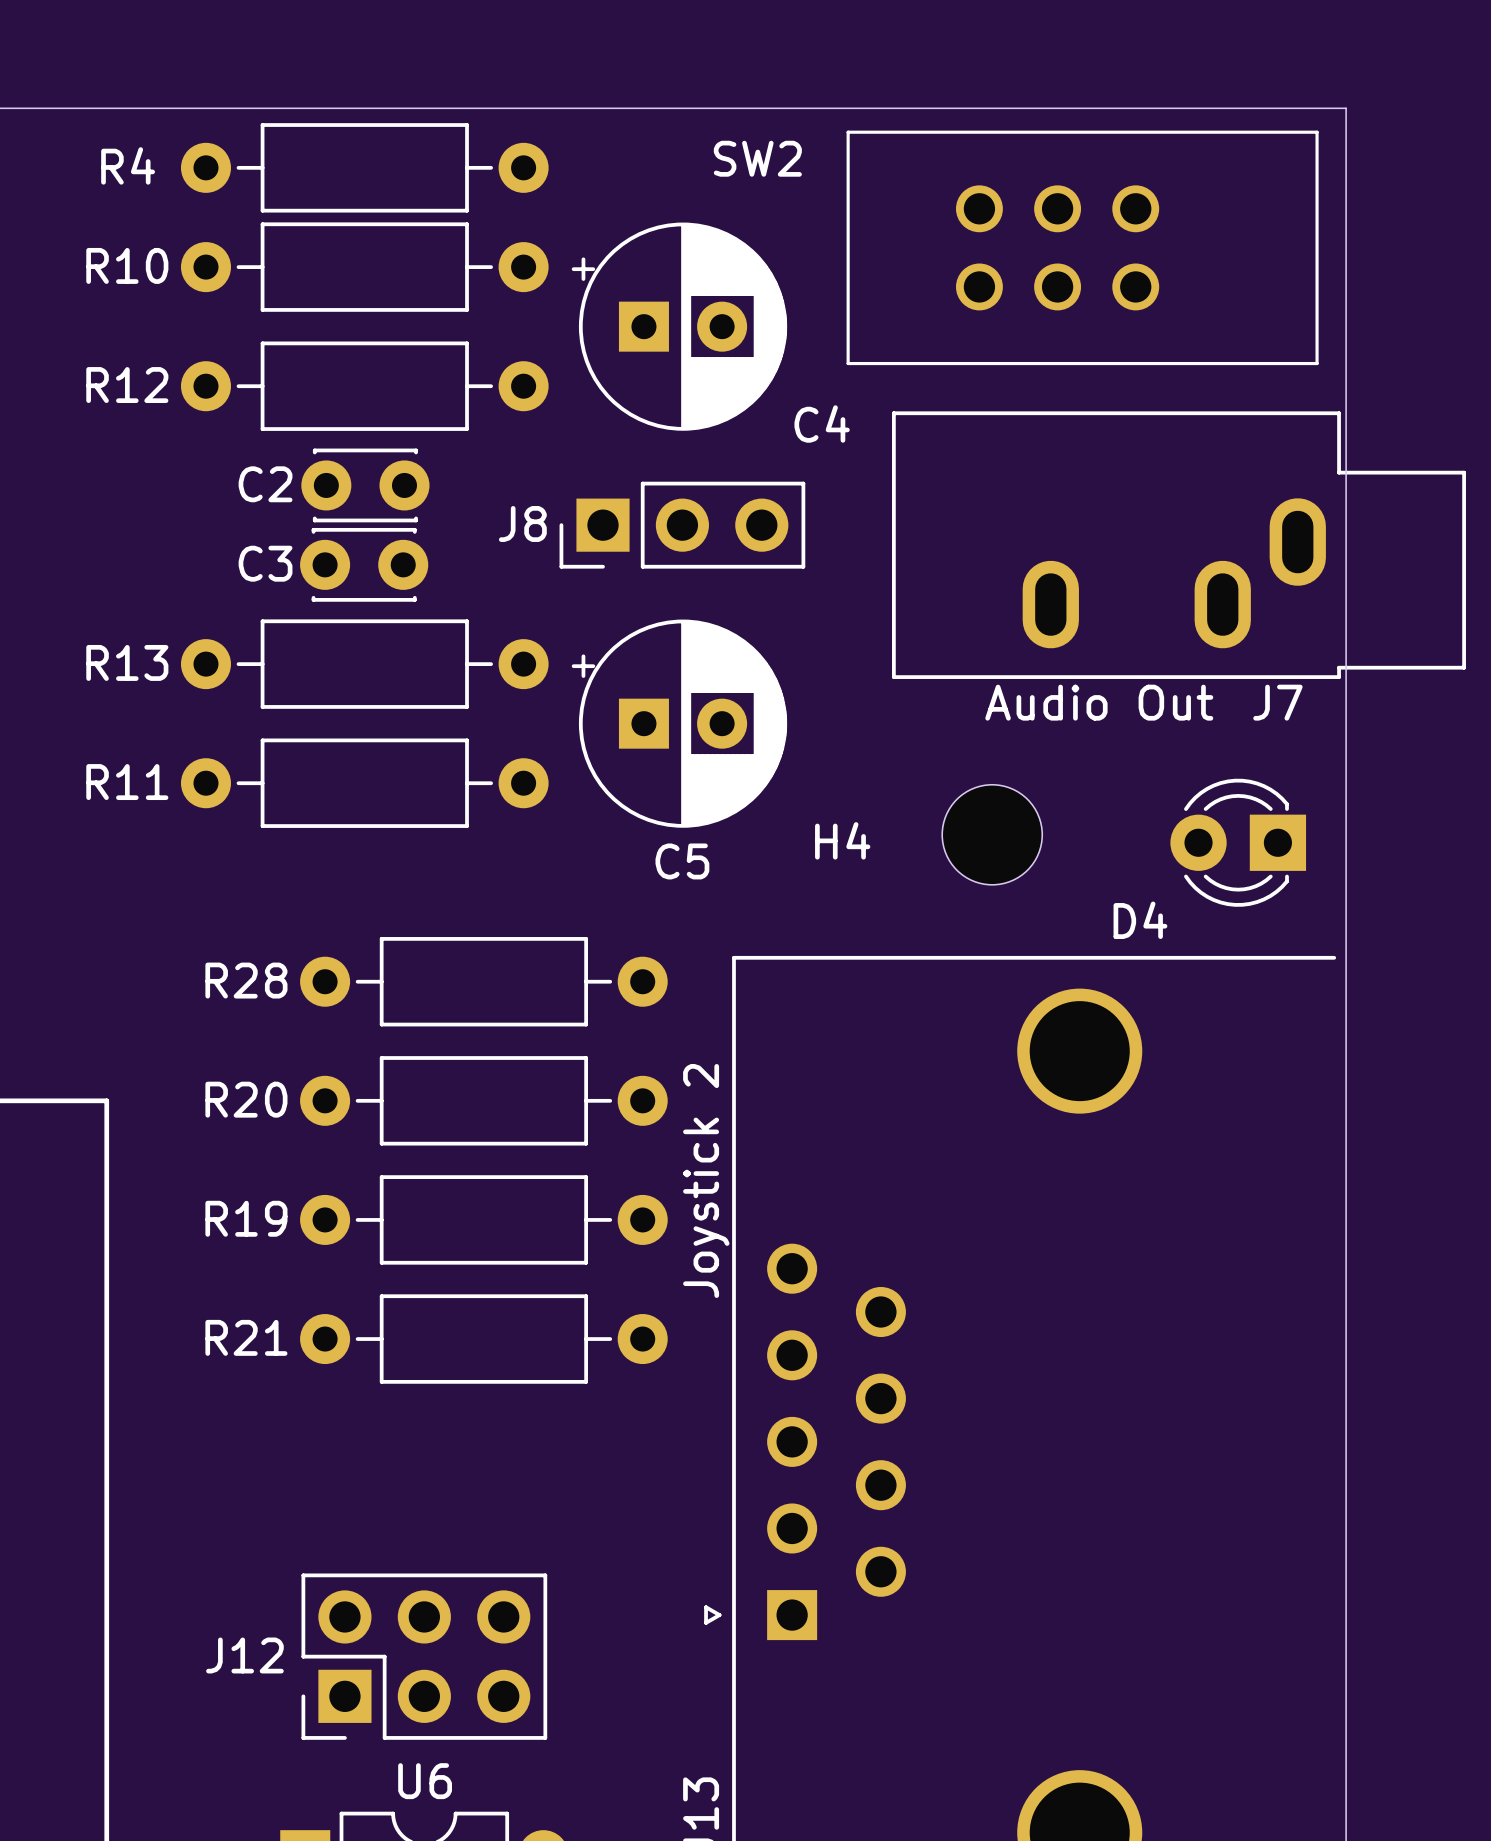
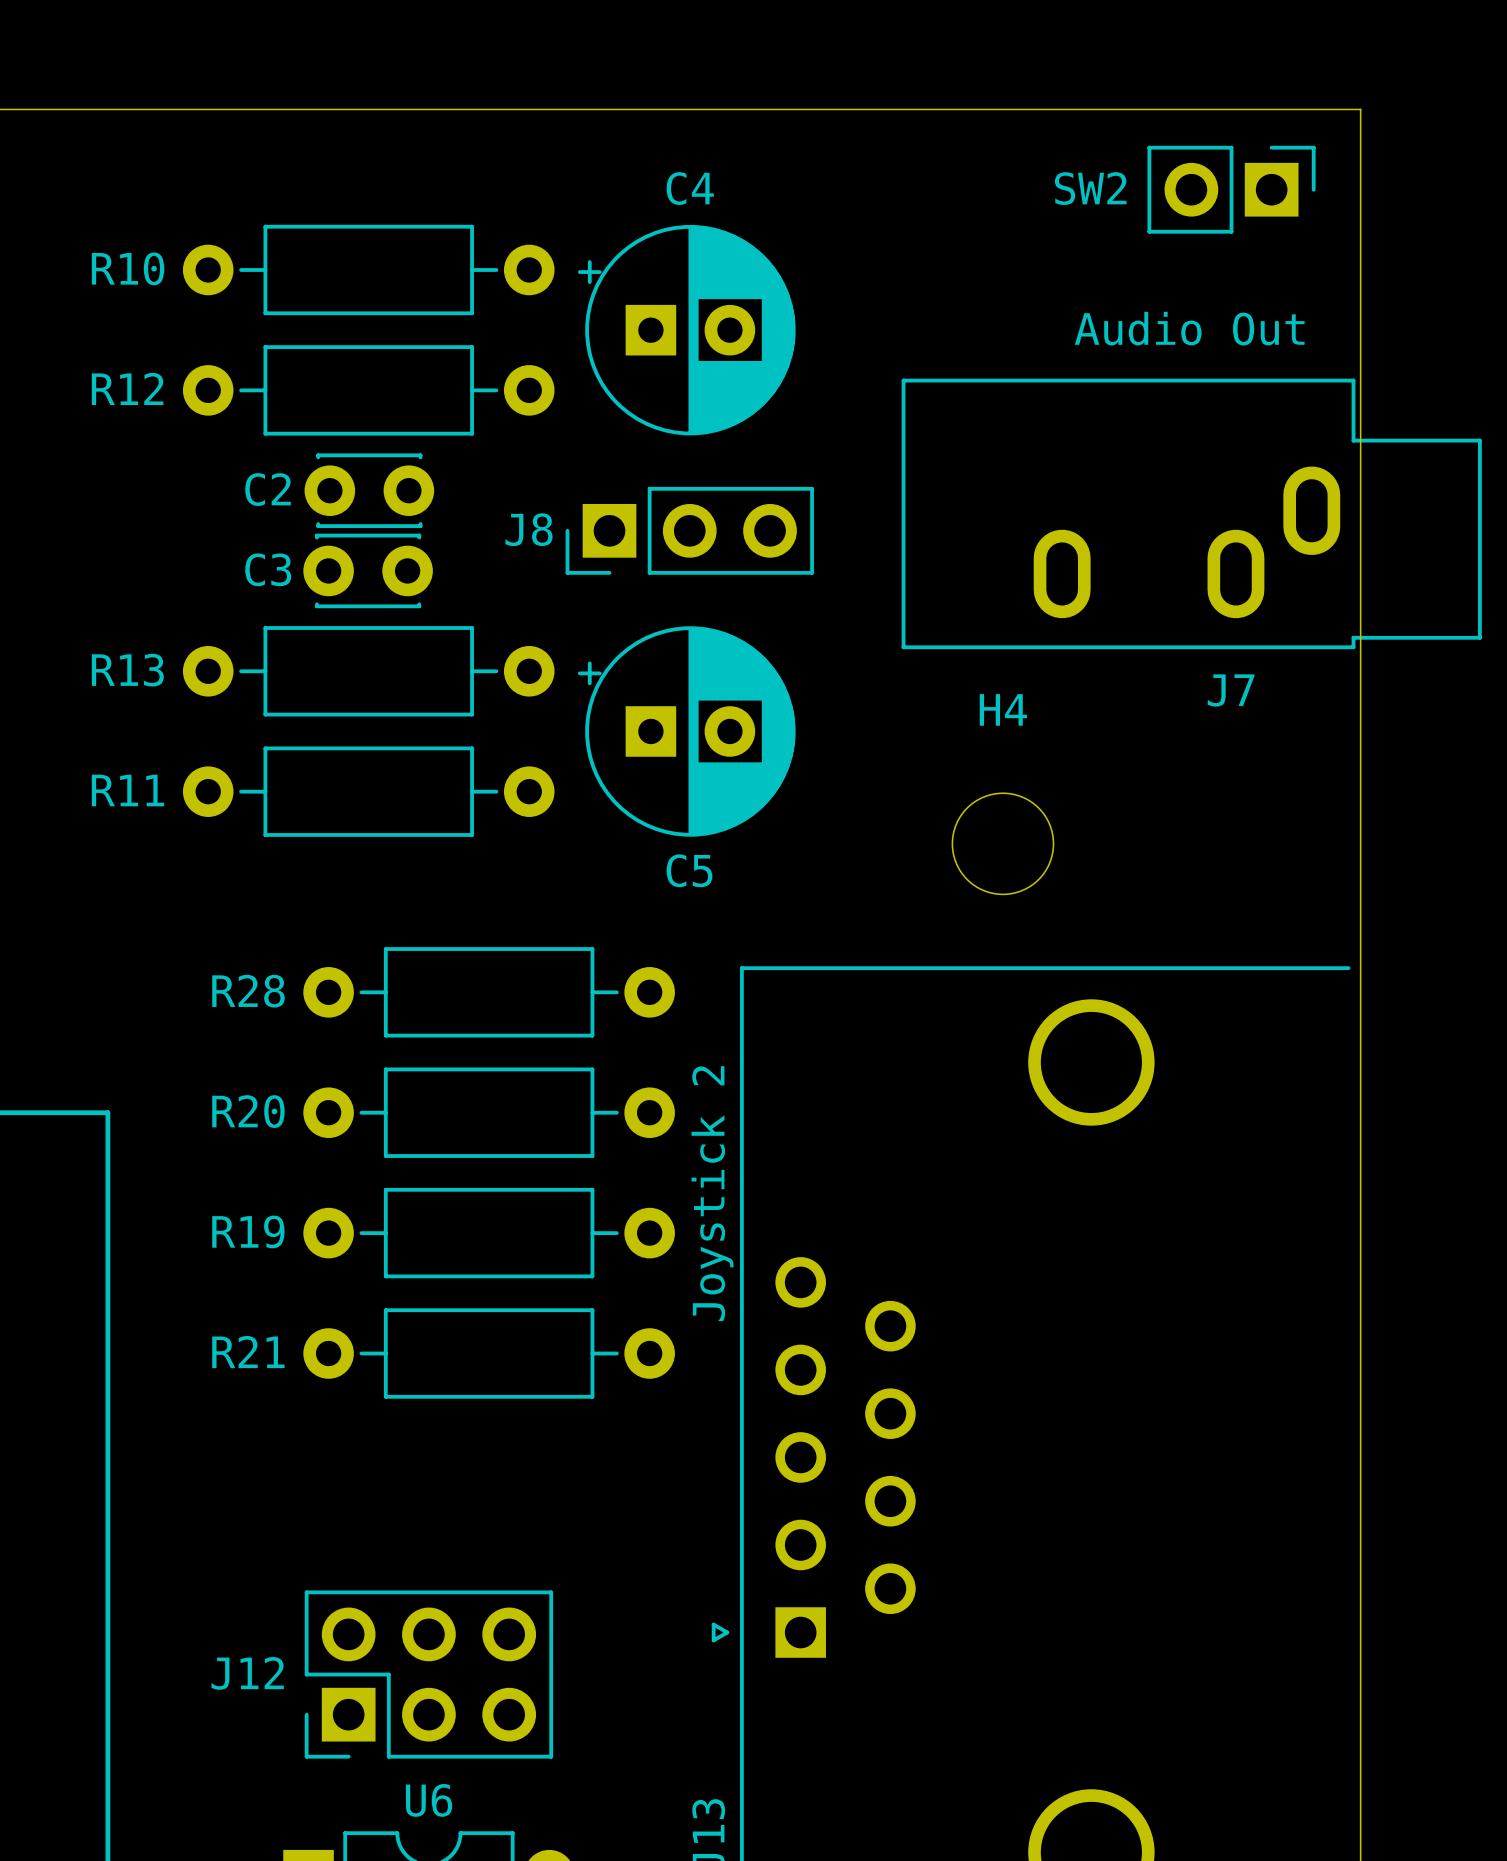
SW2 footprint: [846, 130, 1319, 366] -> [1147, 145, 1316, 234]
SW2 name position: SW2 (757, 158) -> SW2 (1090, 188)
R4: (364, 167) -> none
C4 name position: C4 (822, 423) -> C4 (690, 188)
J7 position: (1178, 545) -> (1191, 513)
text position: Audio Out (1099, 702) -> Audio Out (1189, 328)
J7 name position: J7 (1277, 702) -> J7 (1231, 690)
H4 name position: H4 (842, 840) -> H4 (1003, 709)
D4: (1238, 842) -> none

